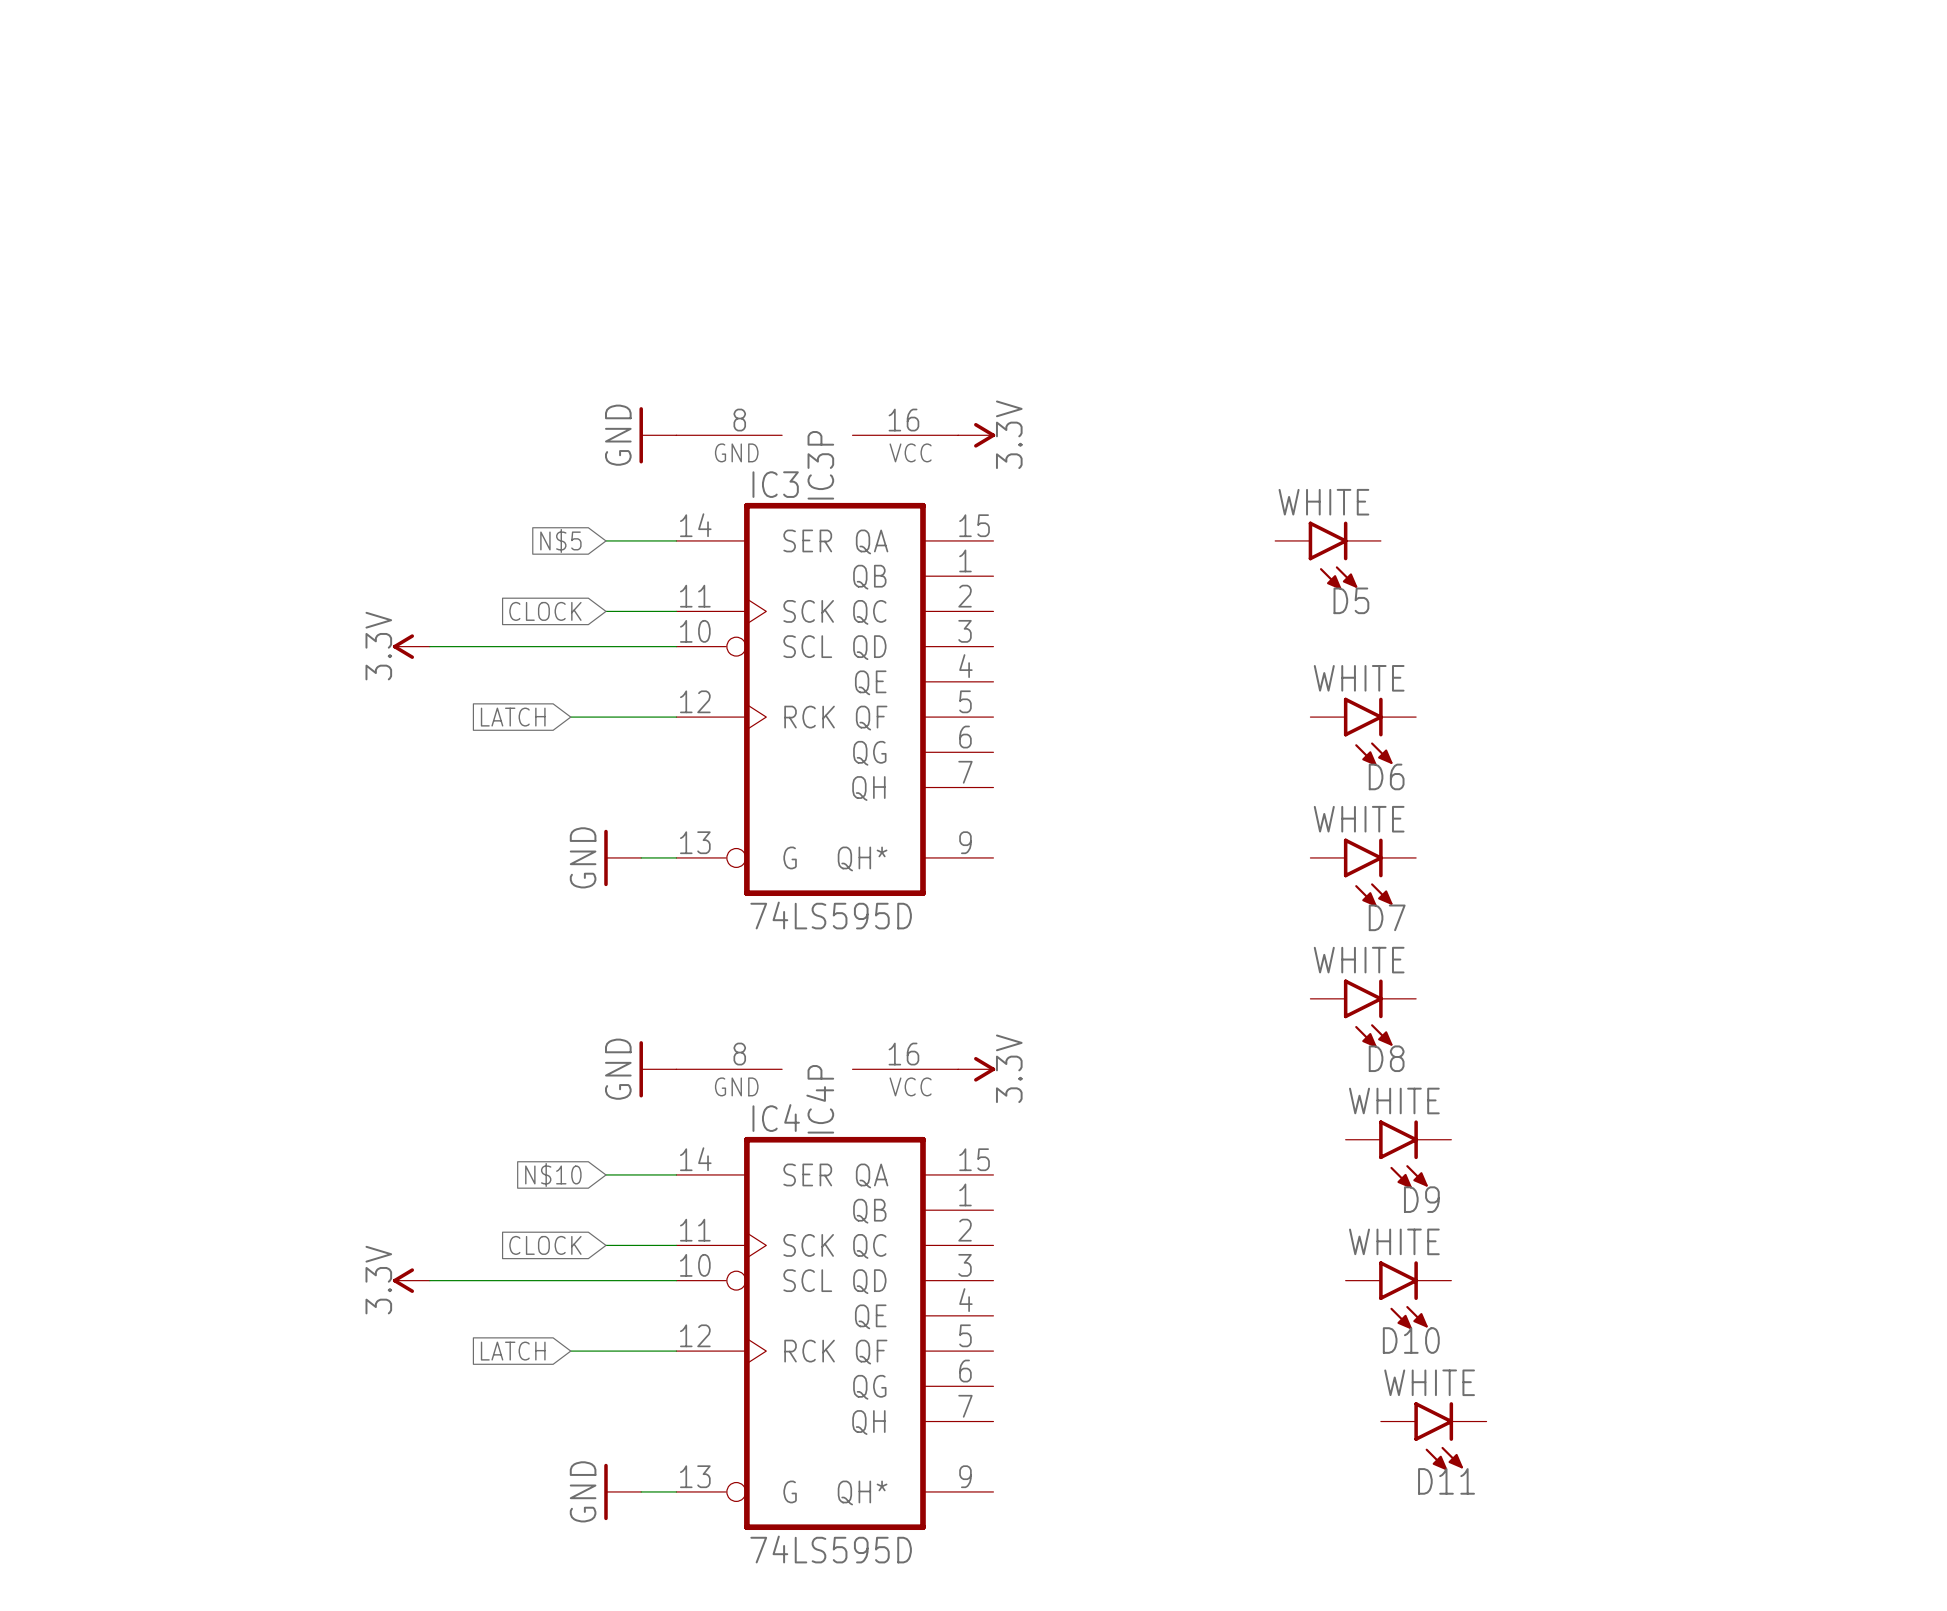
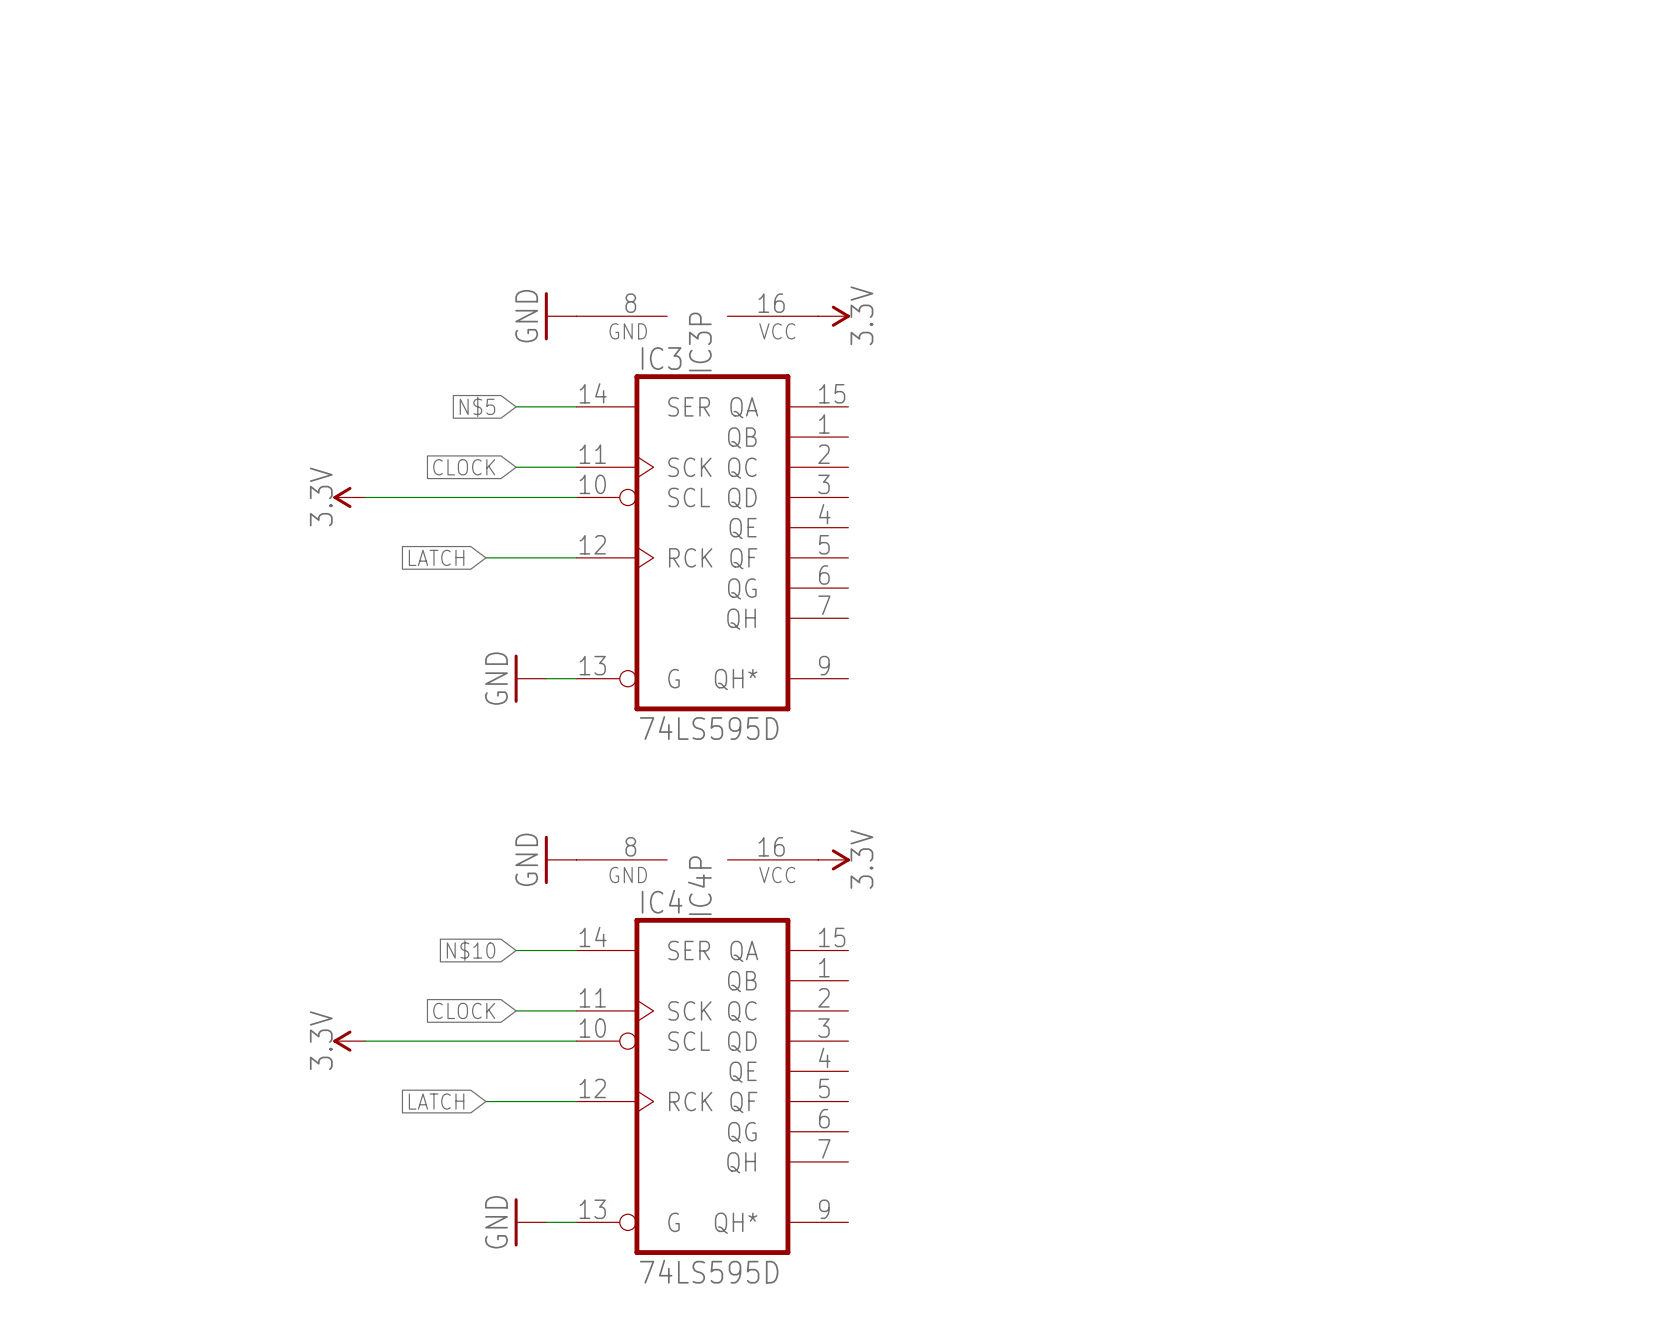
D5: WHITE (1328, 555) -> none
D6: WHITE (1363, 731) -> none
D7: WHITE (1363, 872) -> none
D8: WHITE (1363, 1013) -> none
D9: WHITE (1398, 1154) -> none
D10: WHITE (1398, 1295) -> none
D11: WHITE (1433, 1436) -> none

